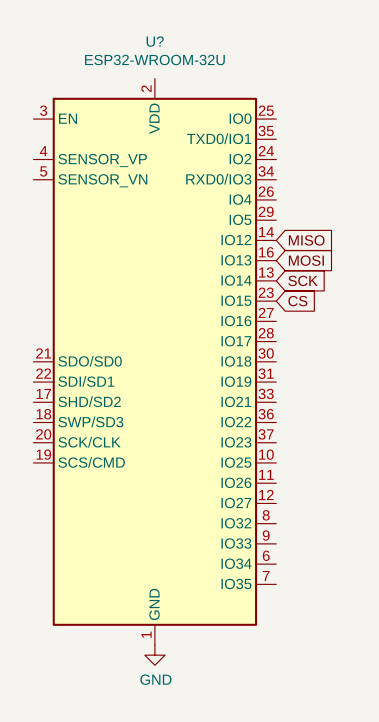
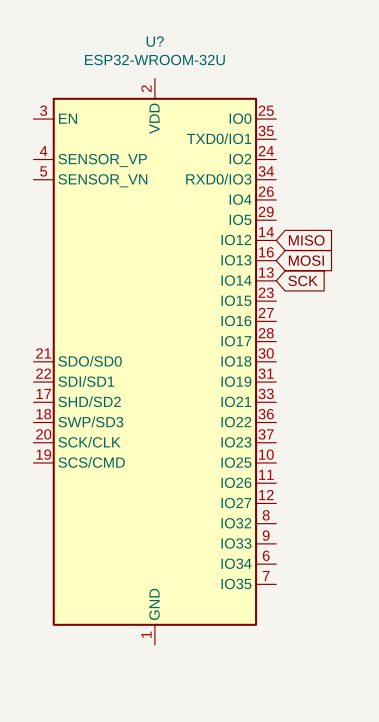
global label: CS (297, 301) -> none
power symbol: GND (154, 655) -> none

